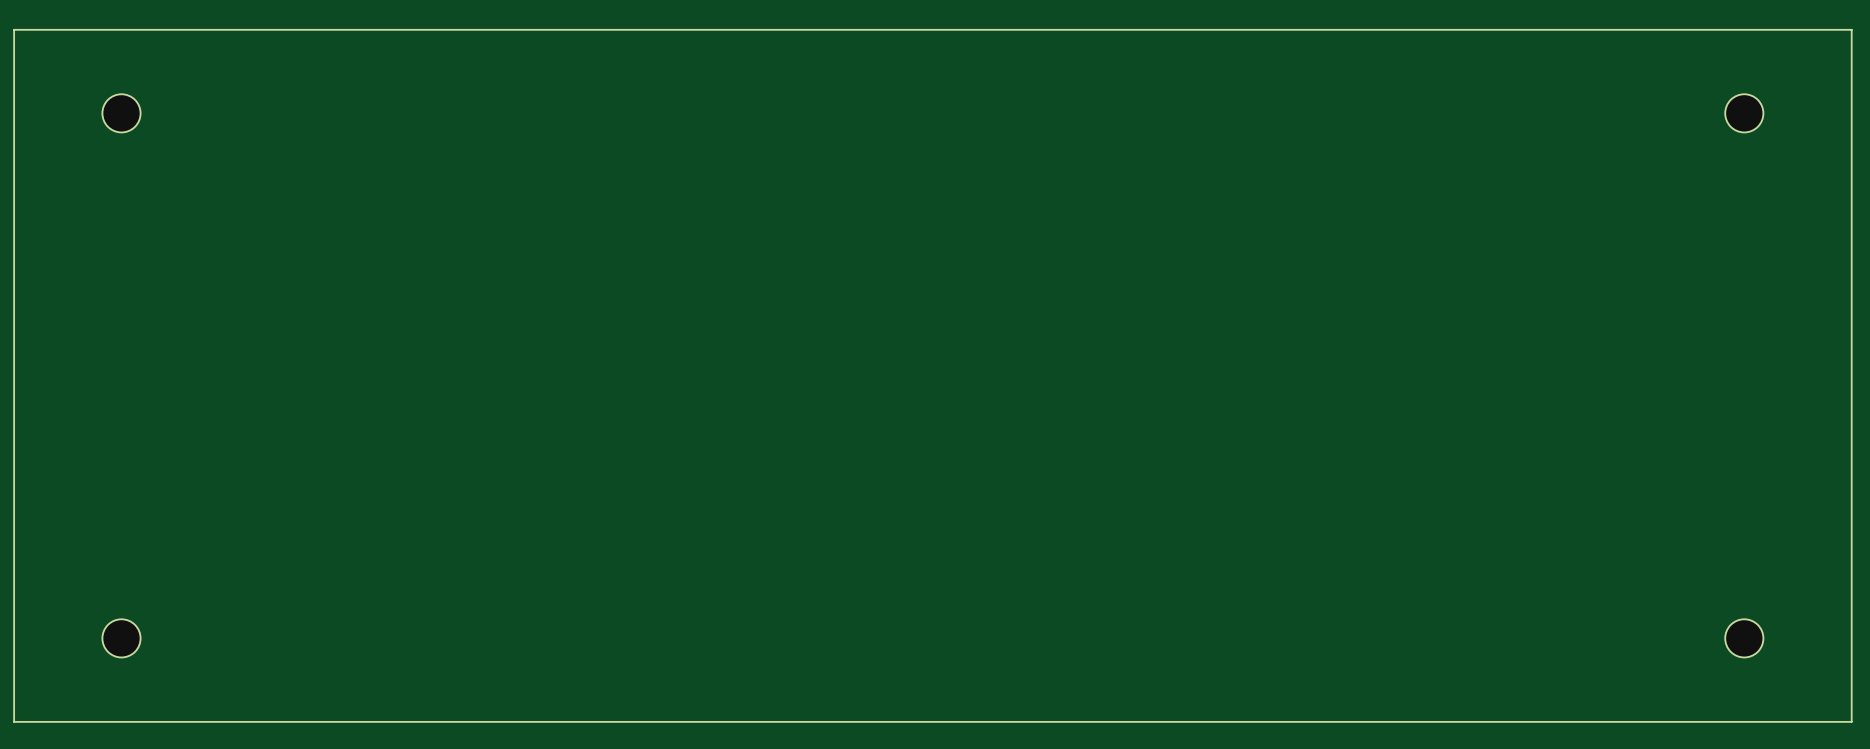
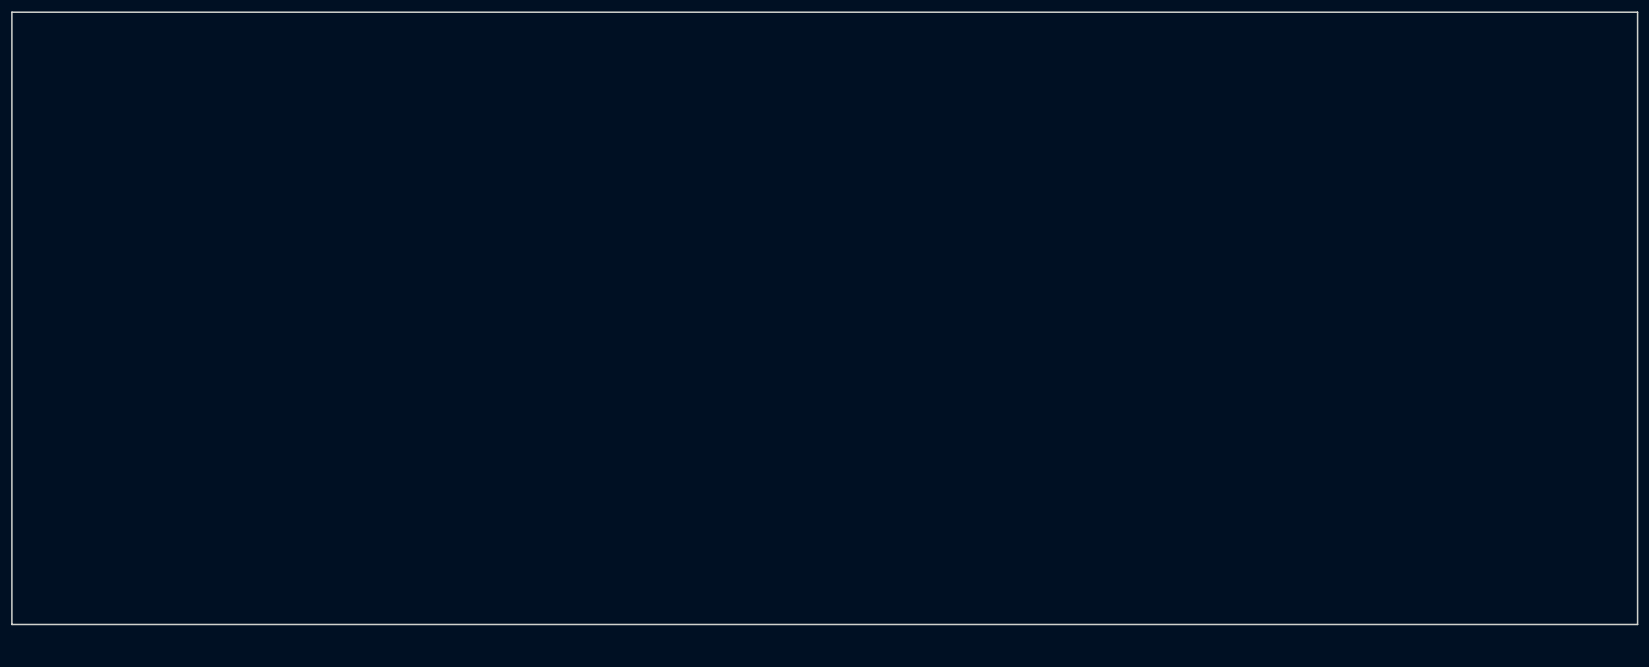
part: (121, 113) -> none
part: (1744, 113) -> none
part: (121, 638) -> none
part: (1744, 638) -> none

